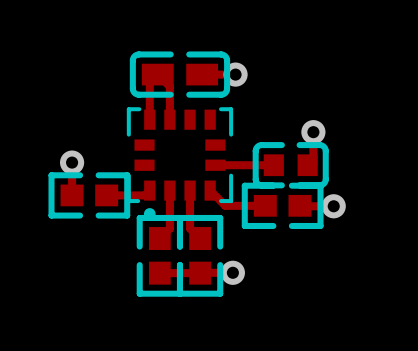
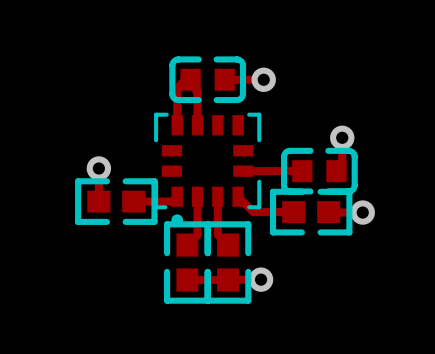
part footprint: [129, 51, 231, 98] -> [169, 56, 247, 104]

